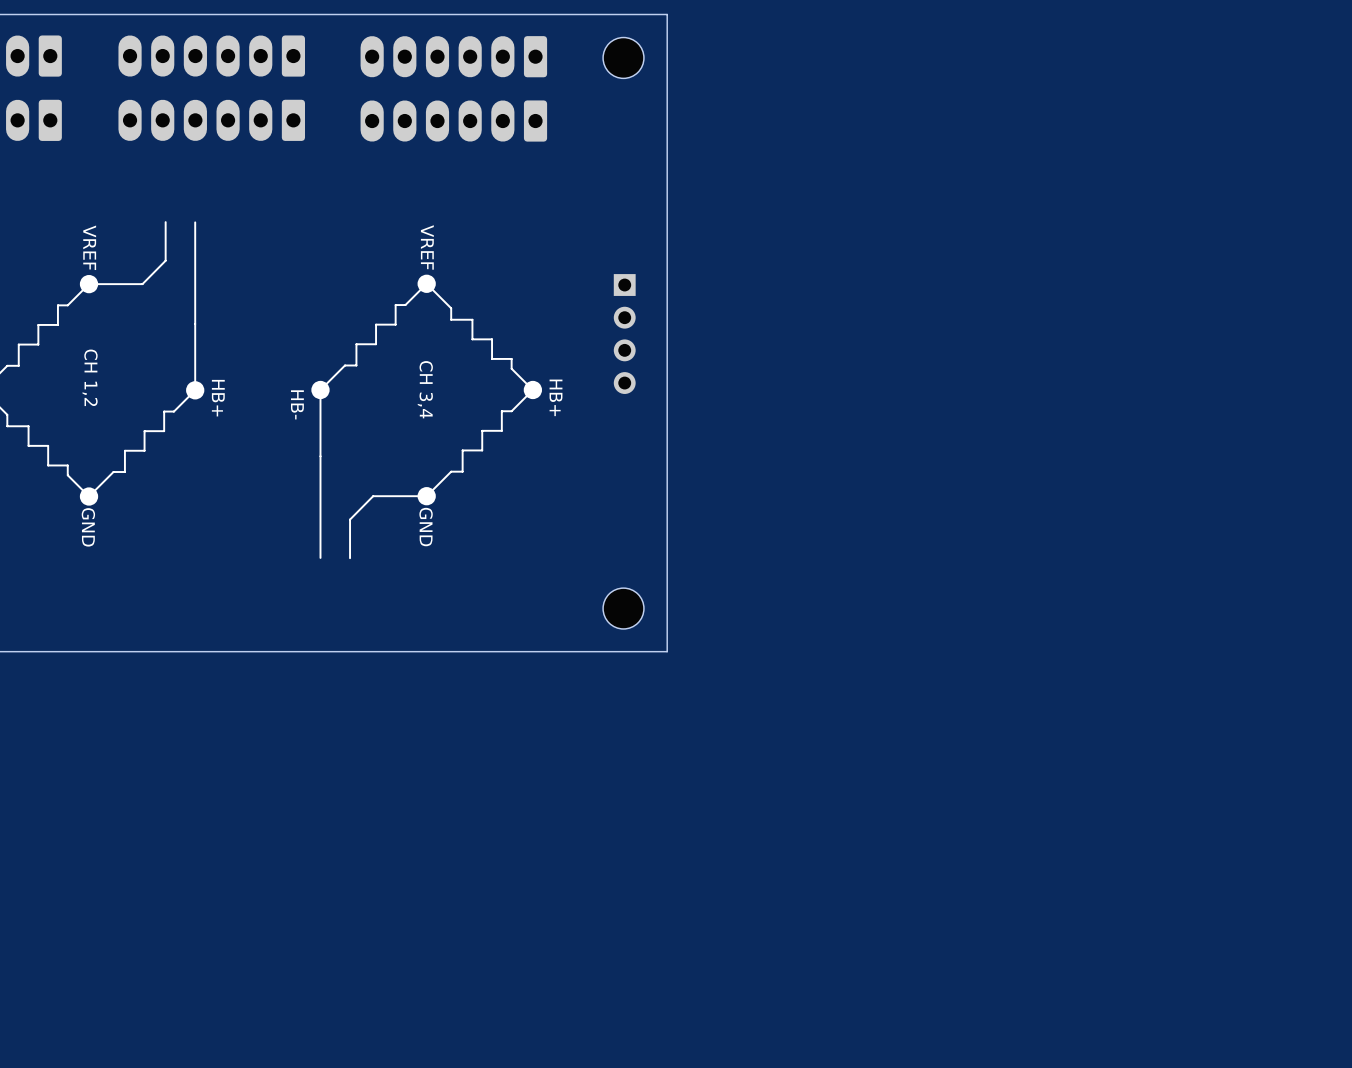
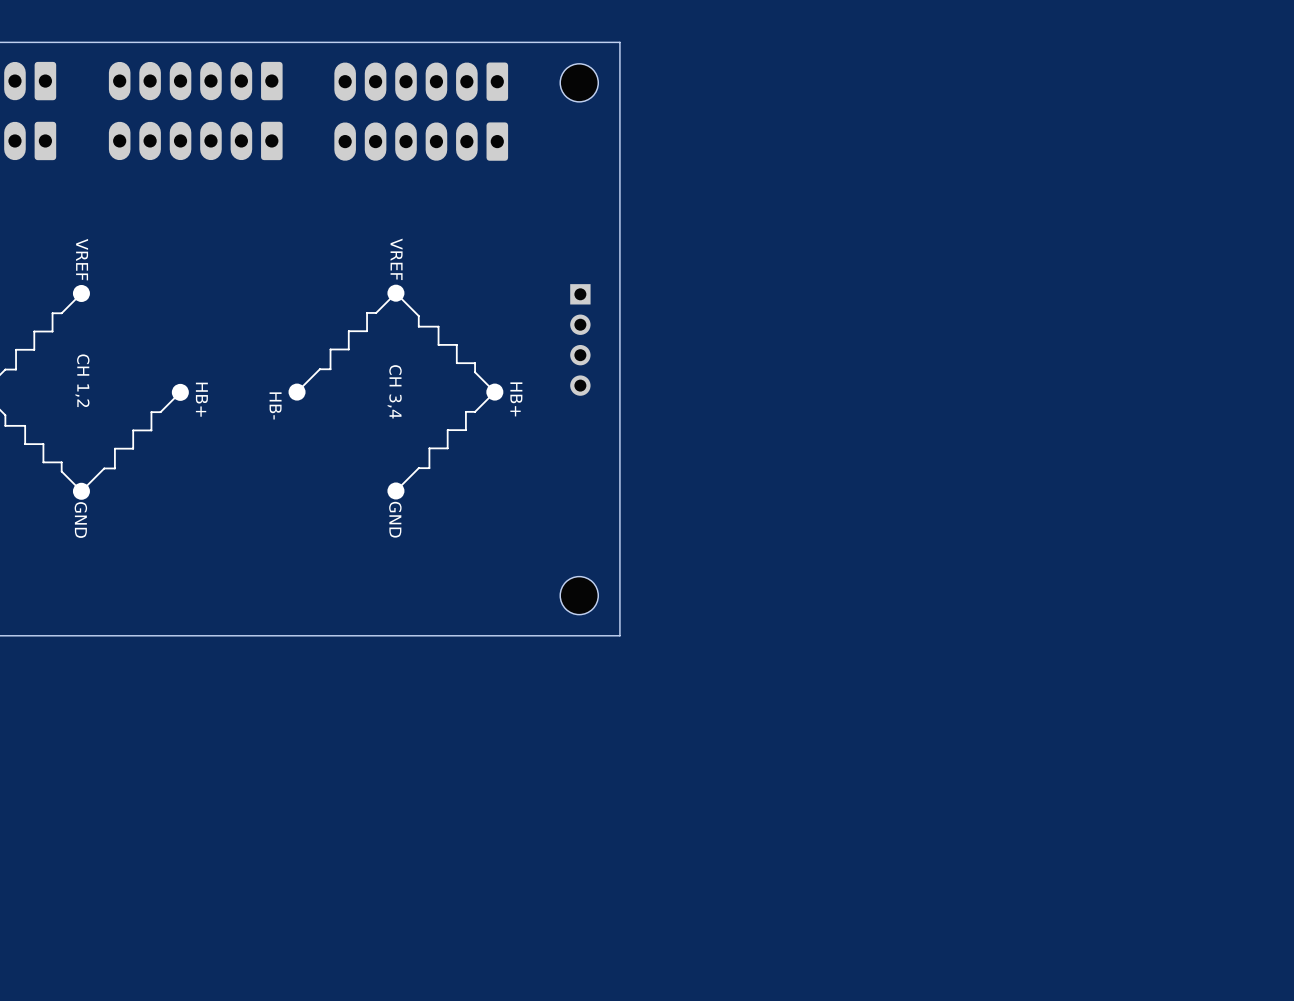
line: (165, 222) (165, 260) (142, 284) (89, 284) -> none
line: (195, 222) (195, 390) -> none
line: (320, 389) (320, 557) -> none
line: (426, 496) (373, 496) (350, 519) (350, 558) -> none

